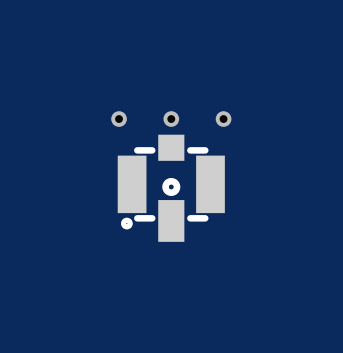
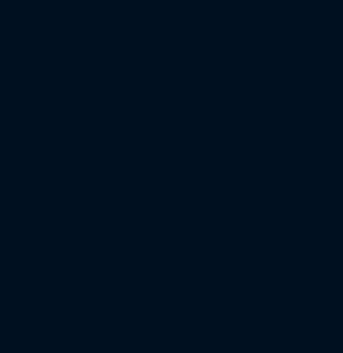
via: (119, 119) -> none
via: (171, 119) -> none
via: (223, 119) -> none
part: (171, 188) -> none

